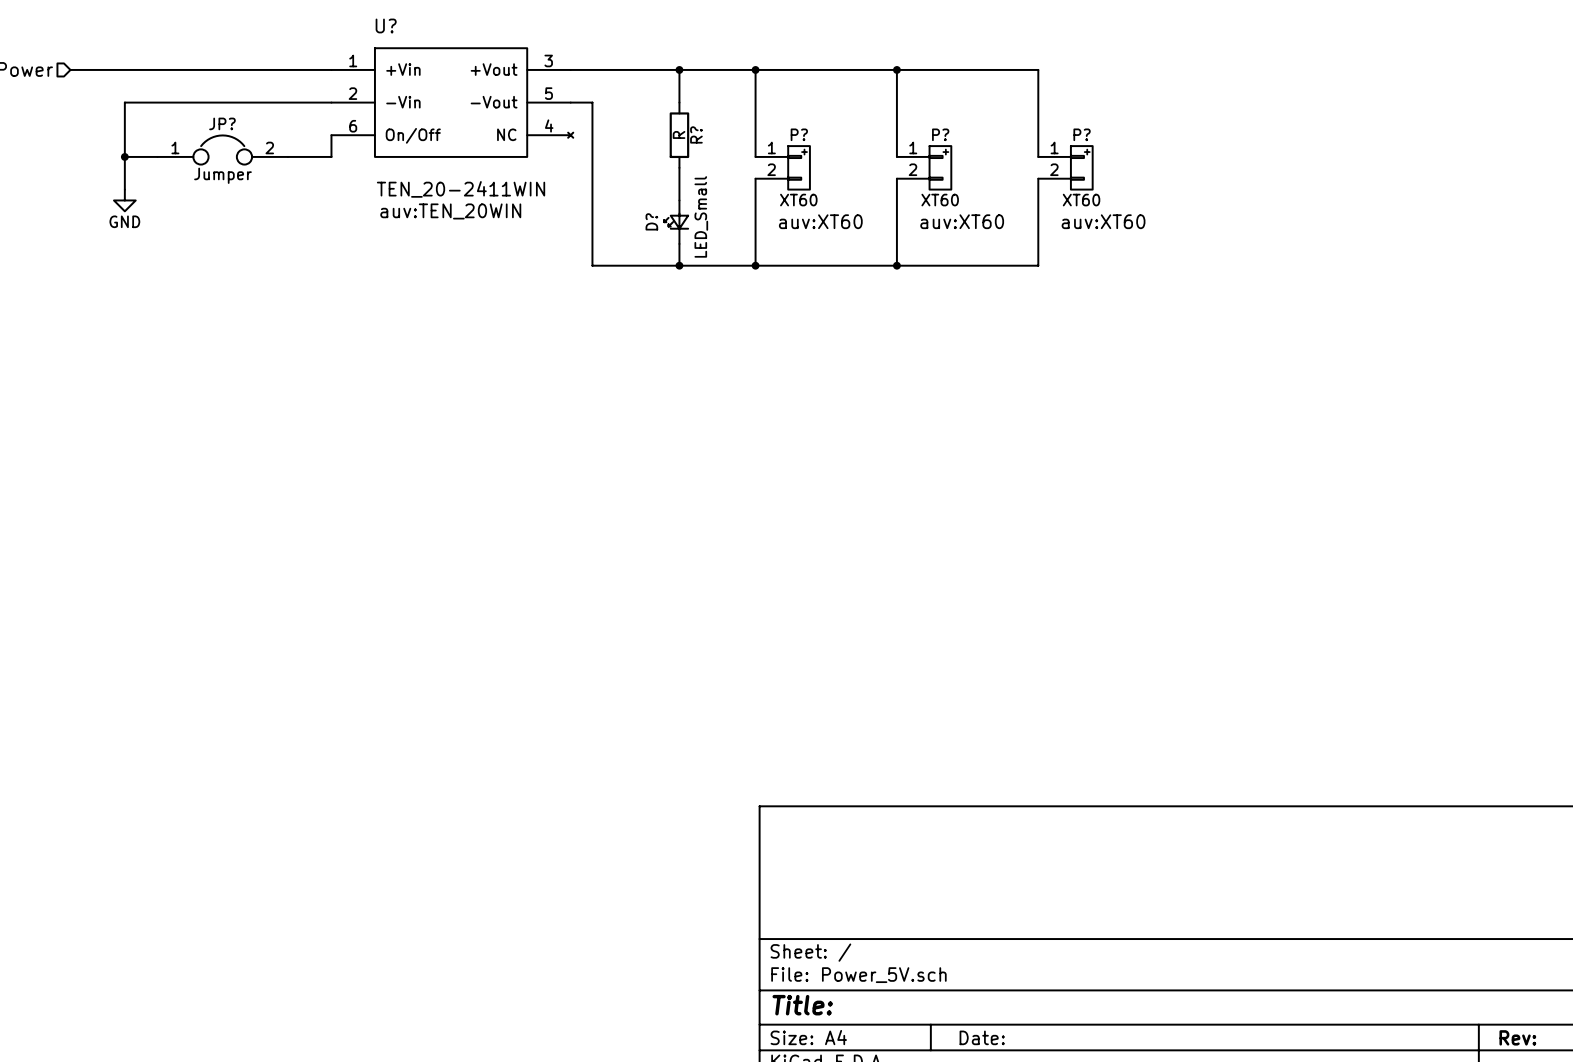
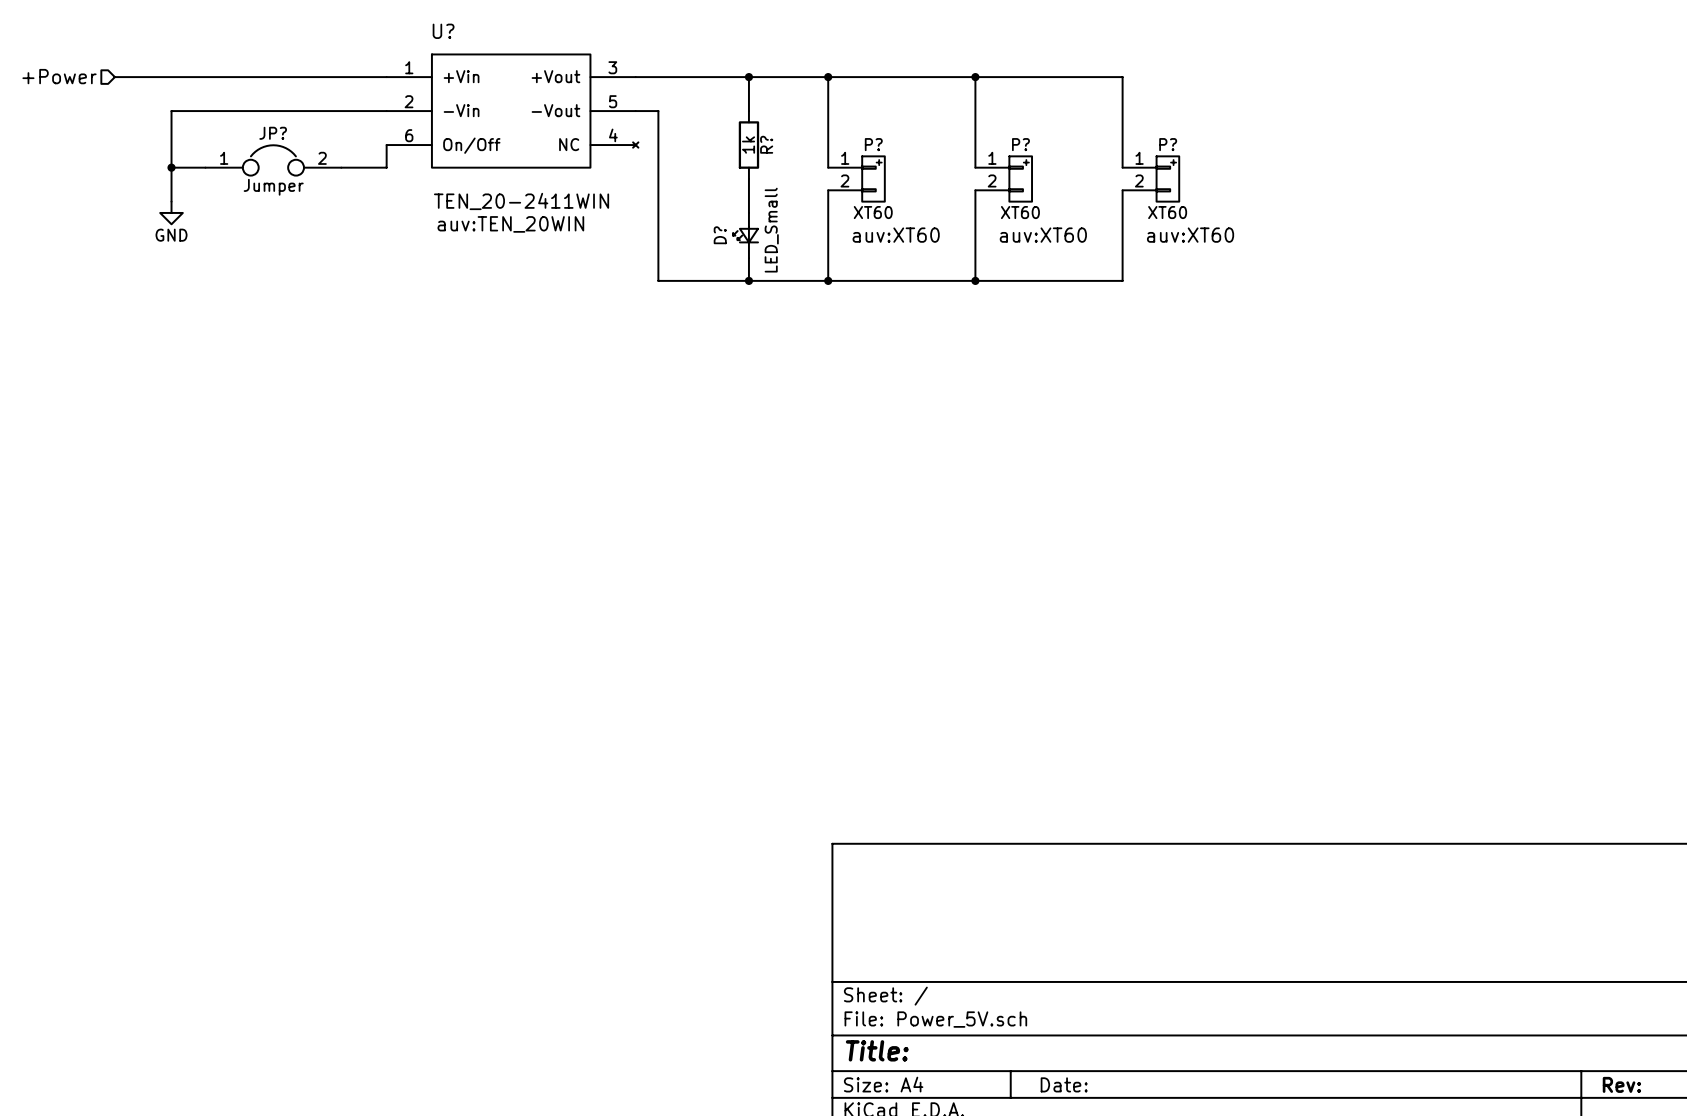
R? value: R (679, 134) -> 1k (748, 145)

